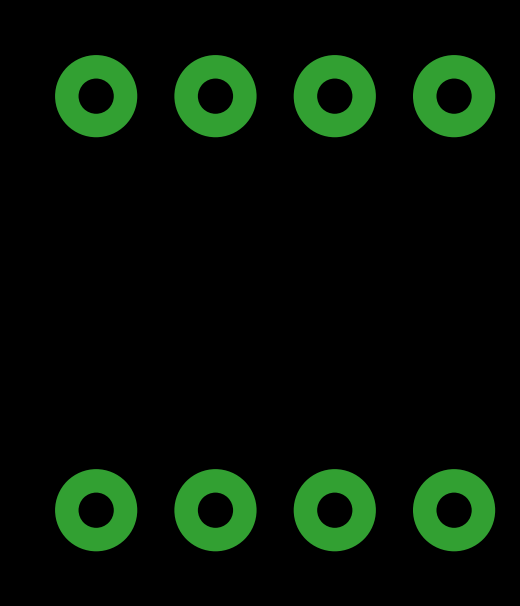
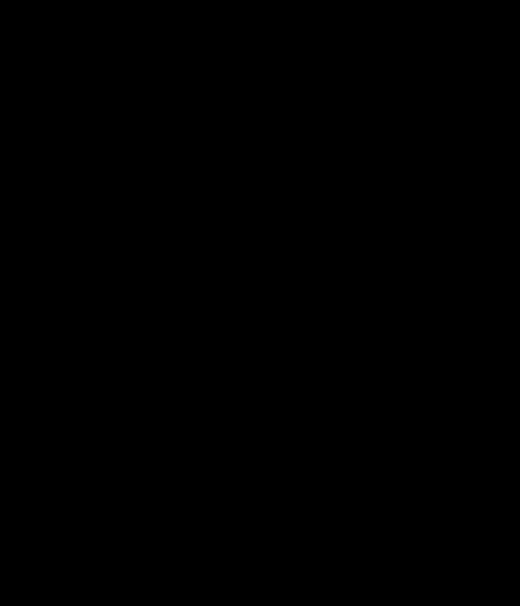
part: (275, 96) -> none
part: (275, 510) -> none

